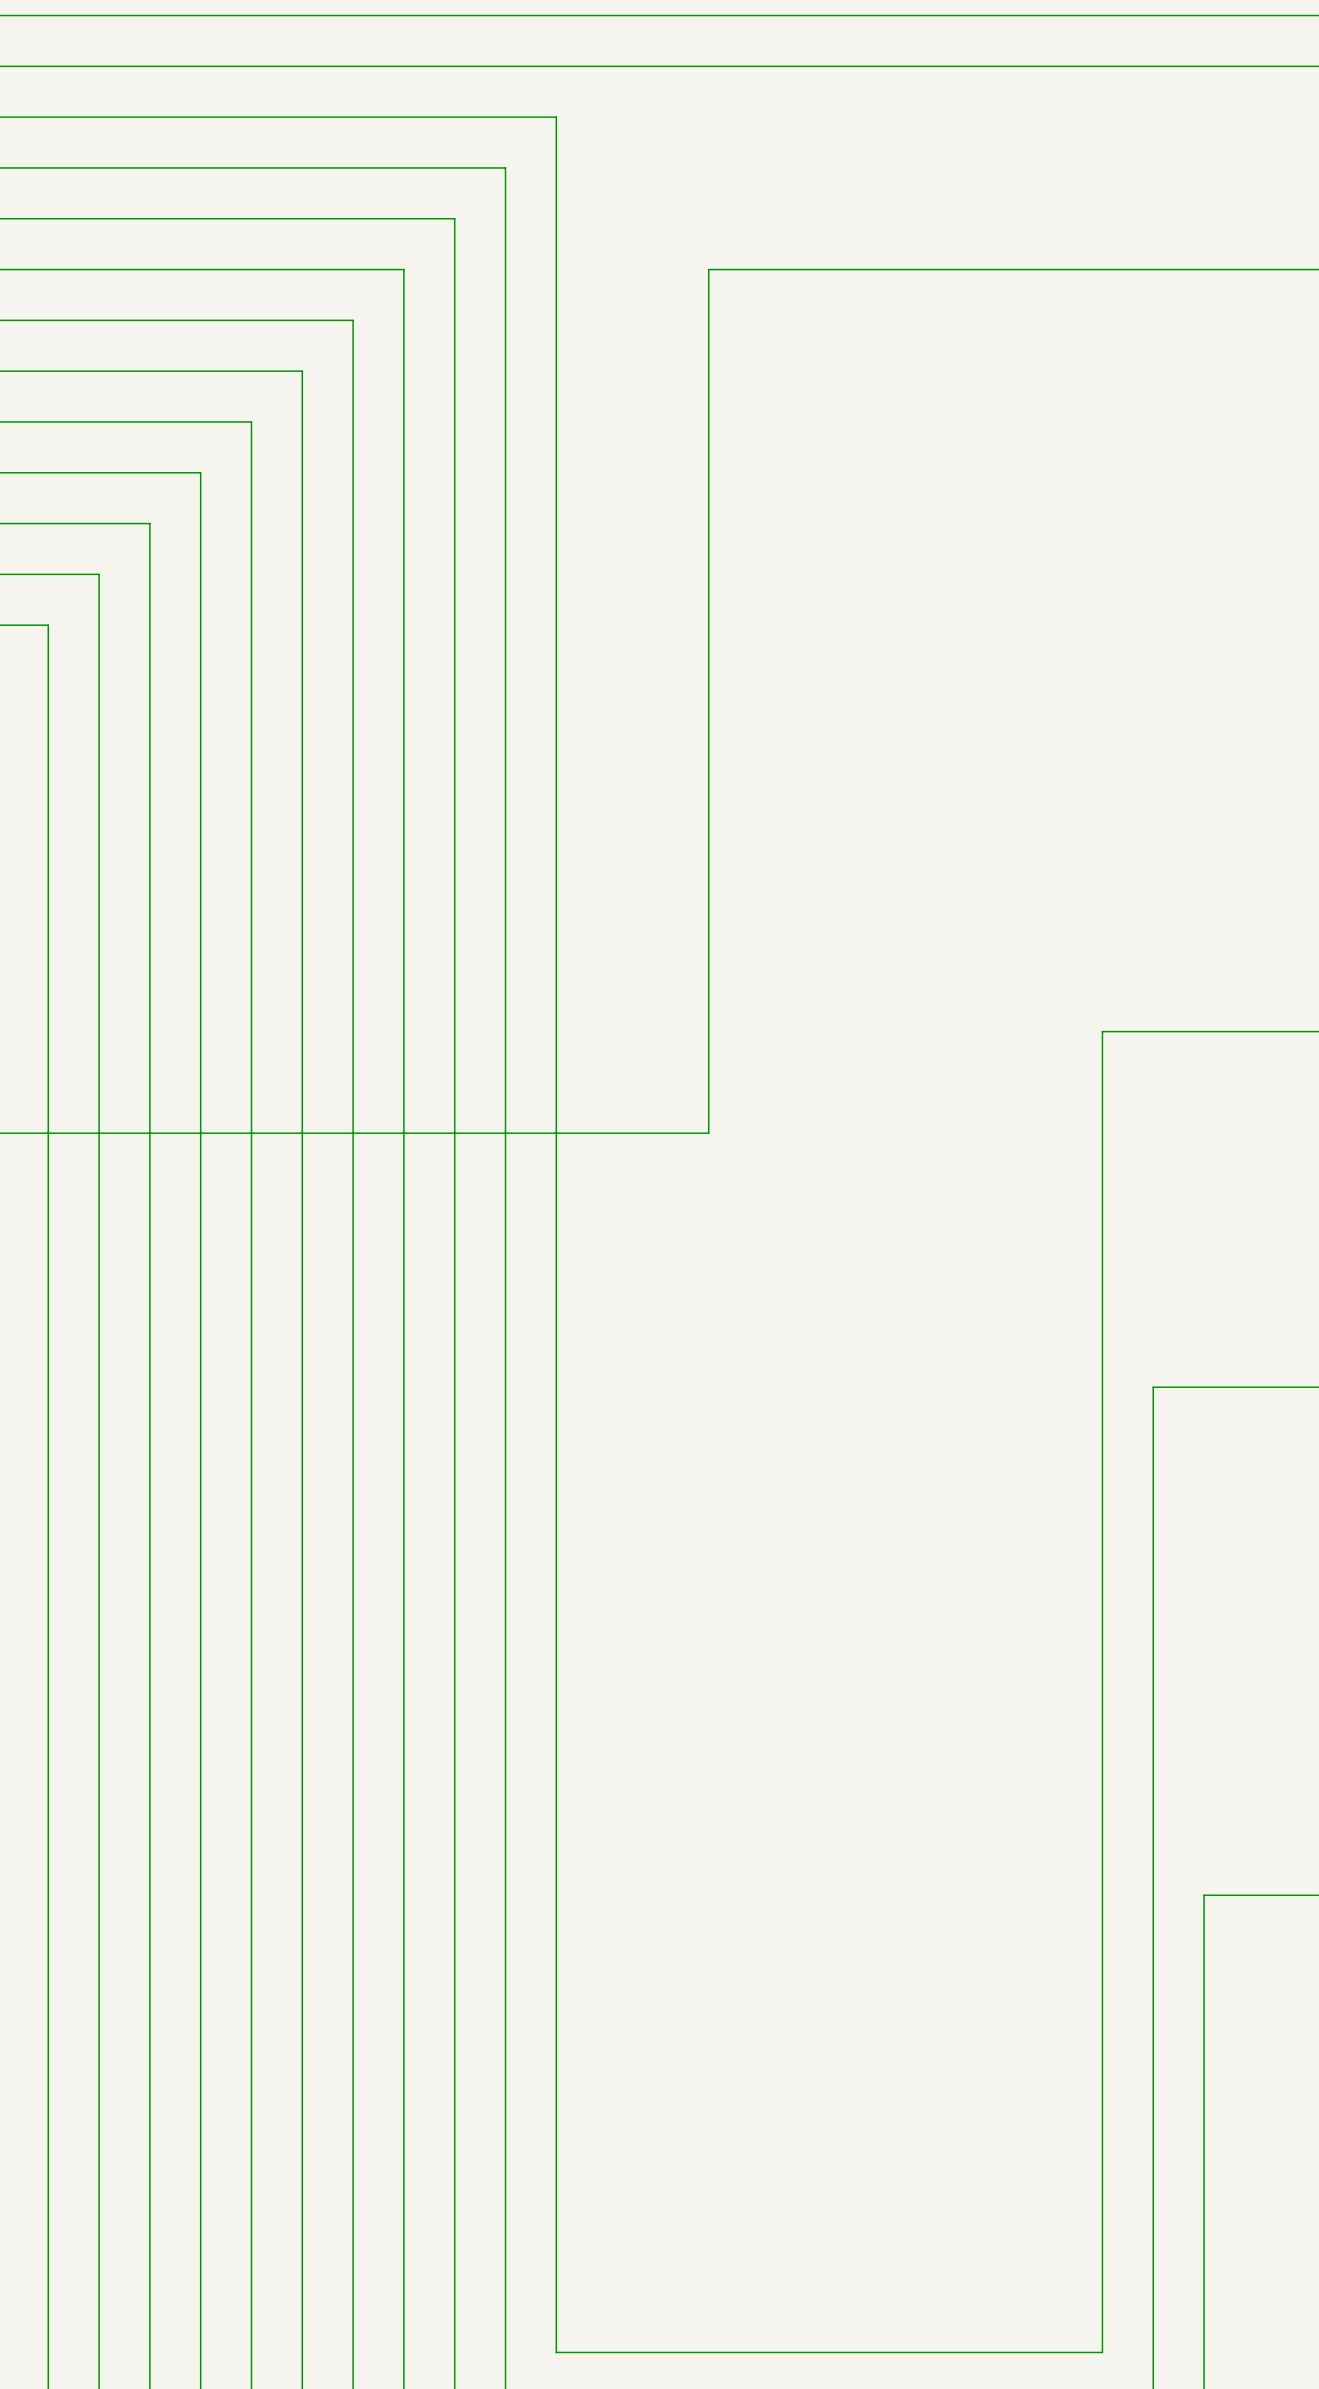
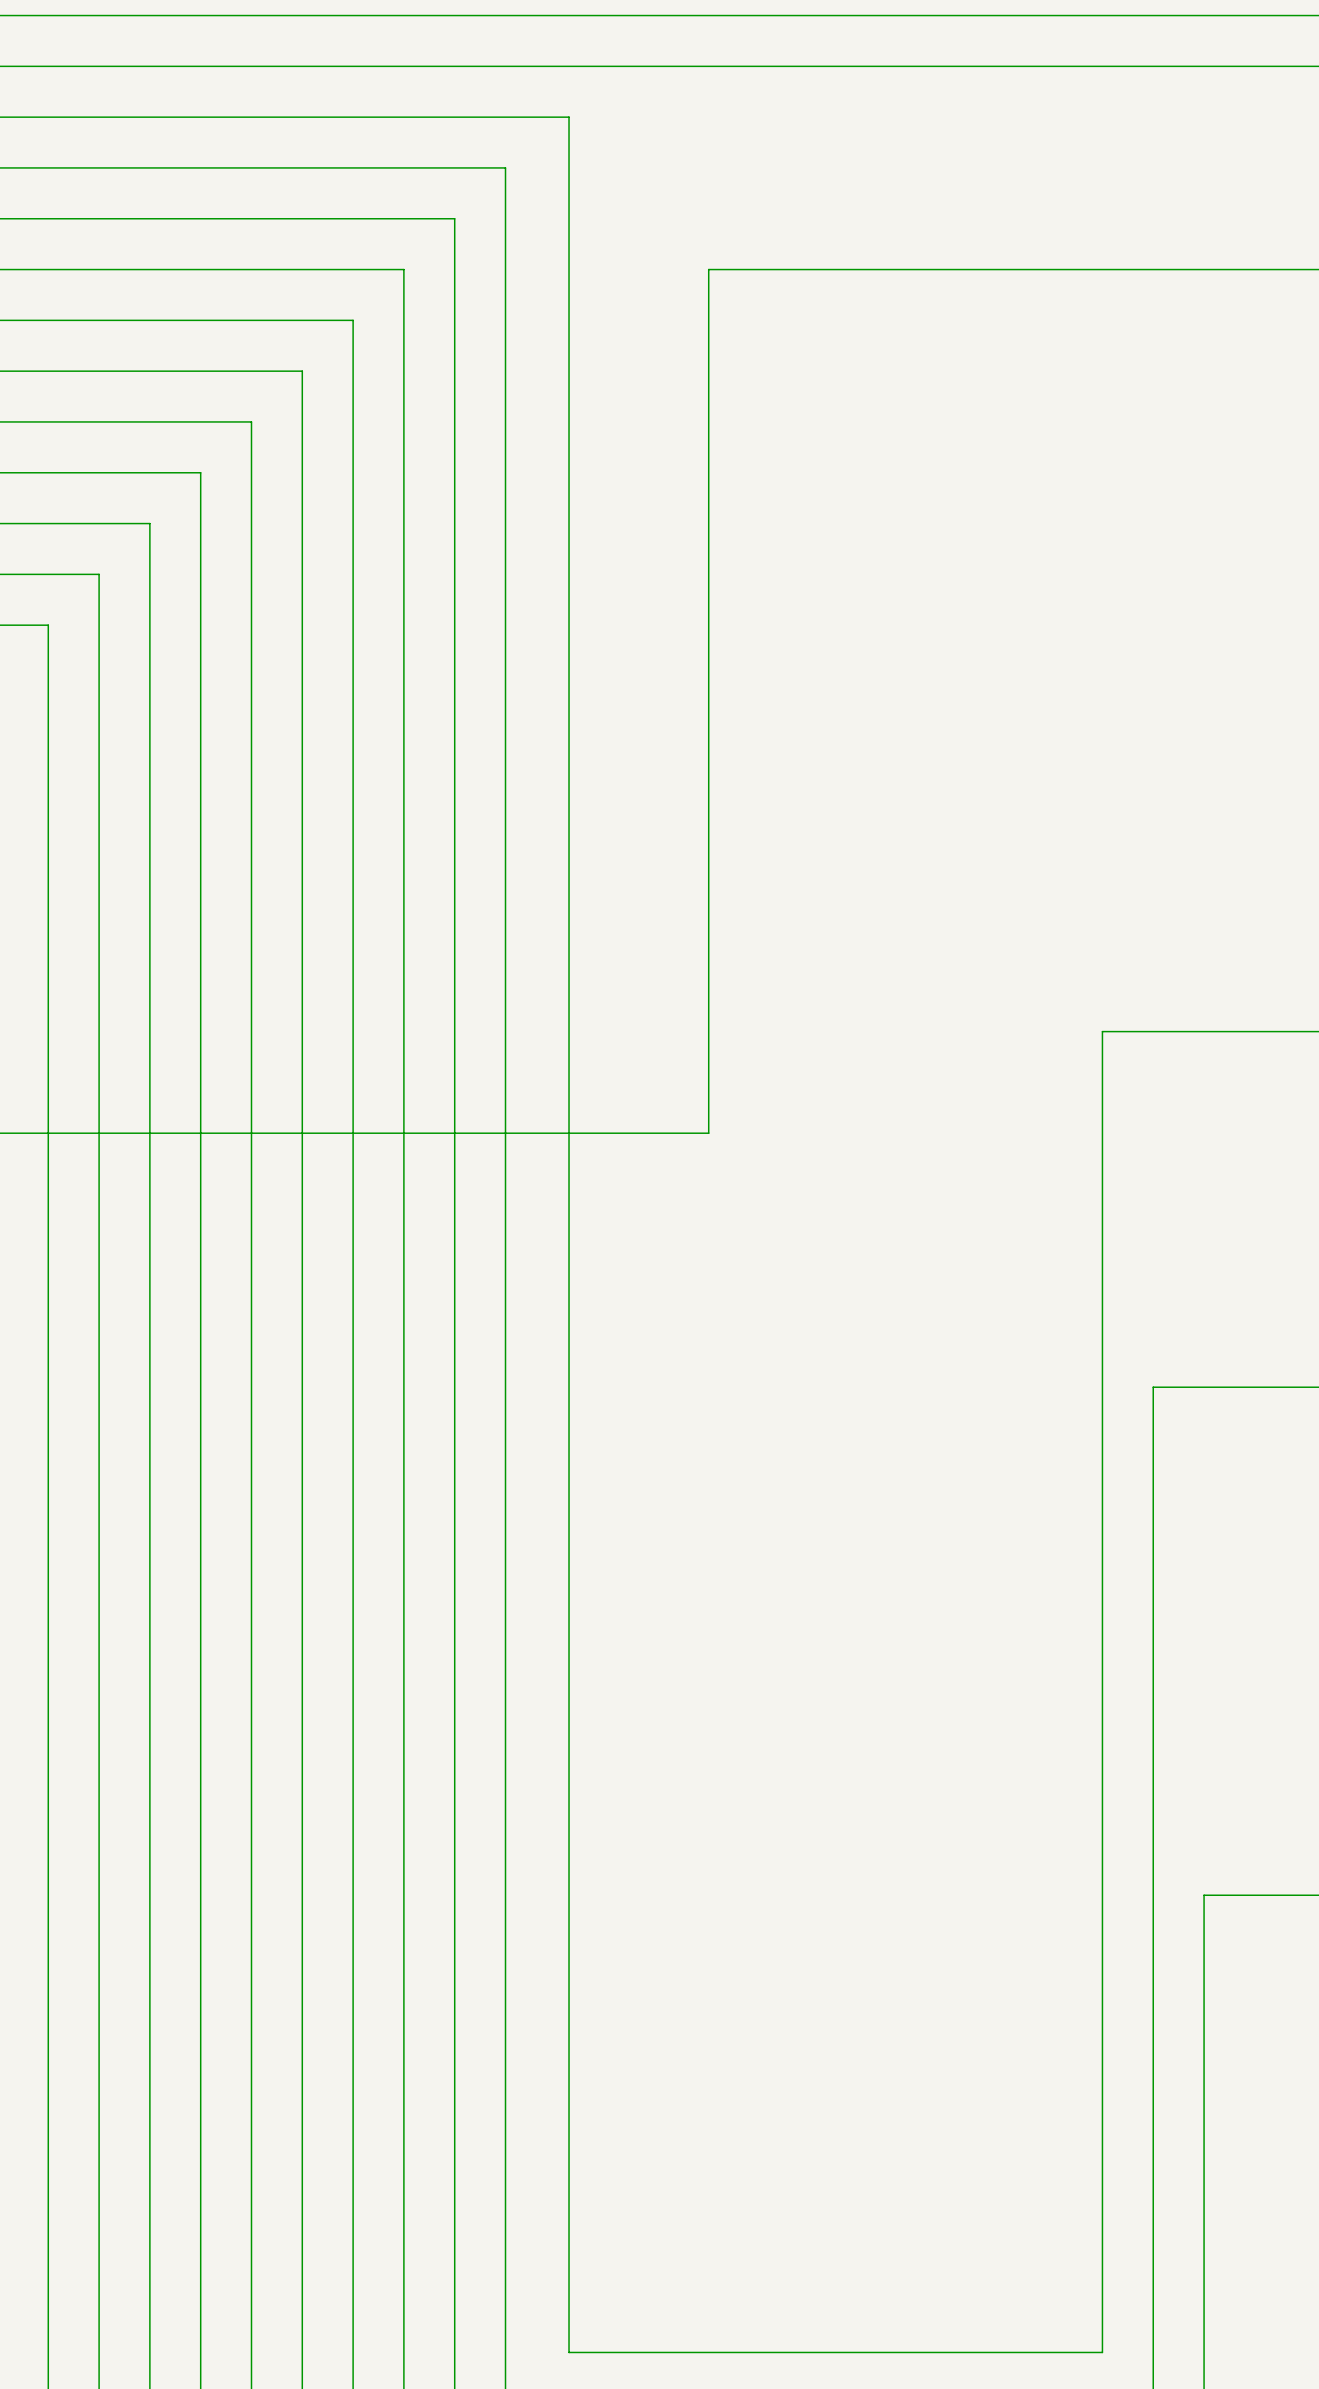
wire: (556, 117) (556, 2352) (569, 2352) -> (556, 117) (569, 117) (569, 2352)

